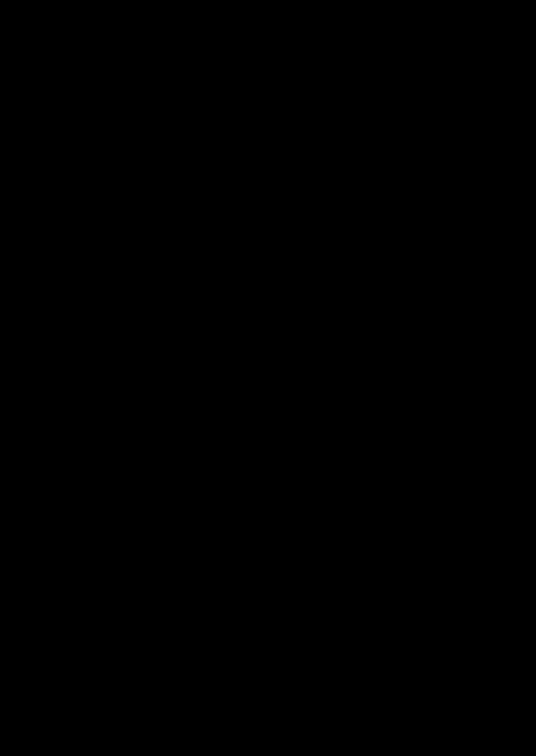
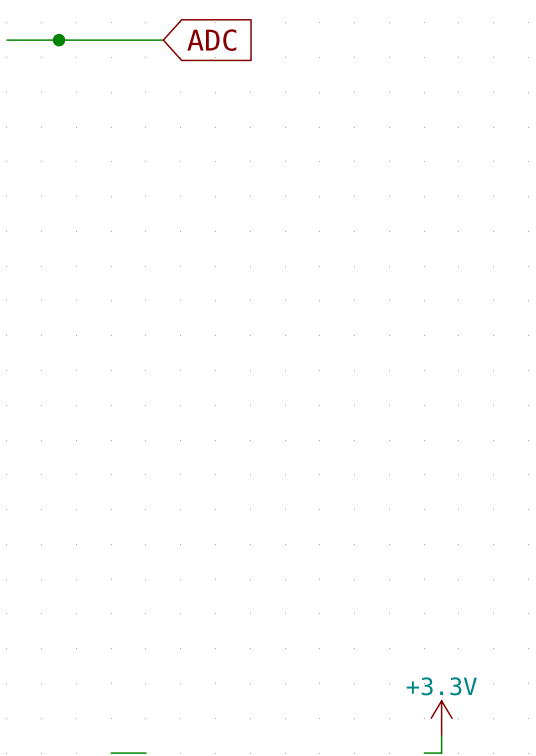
wire: none -> (6, 40) (163, 40)
junction: none -> (59, 40)
global label: none -> ADC (211, 40)
power symbol: none -> +3.3V (441, 718)
wire: none -> (441, 735) (441, 753) (424, 753)
wire: none -> (111, 753) (145, 753)

